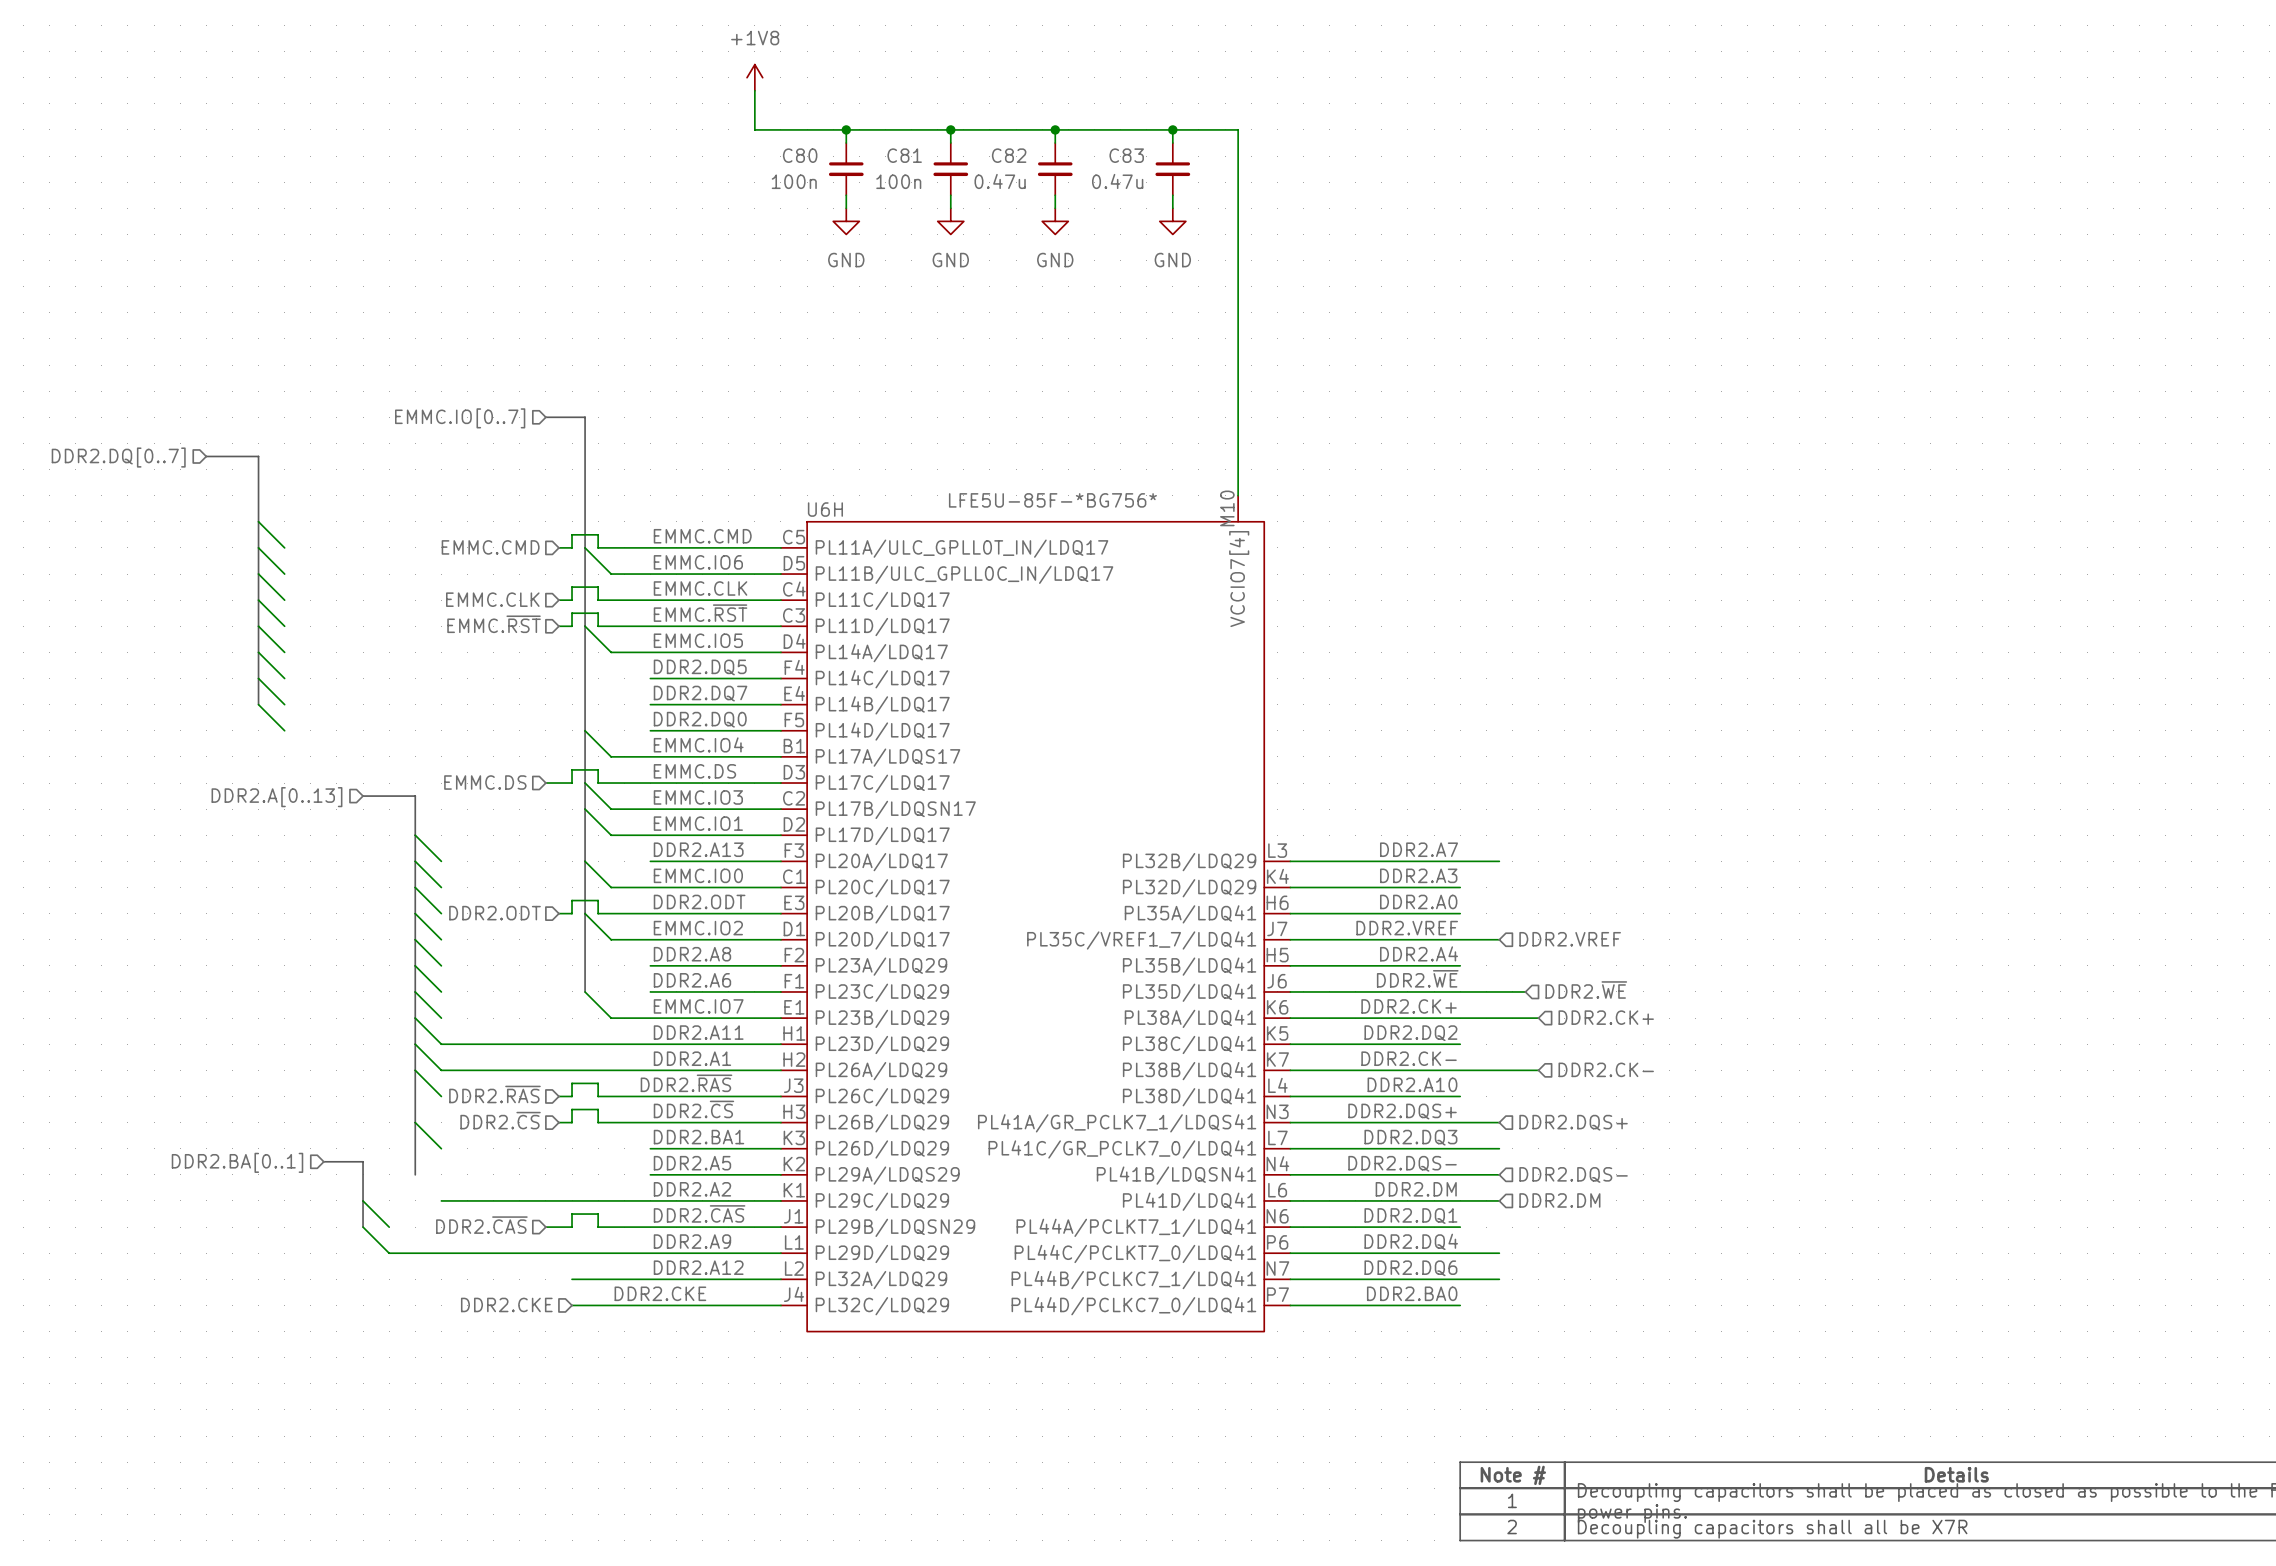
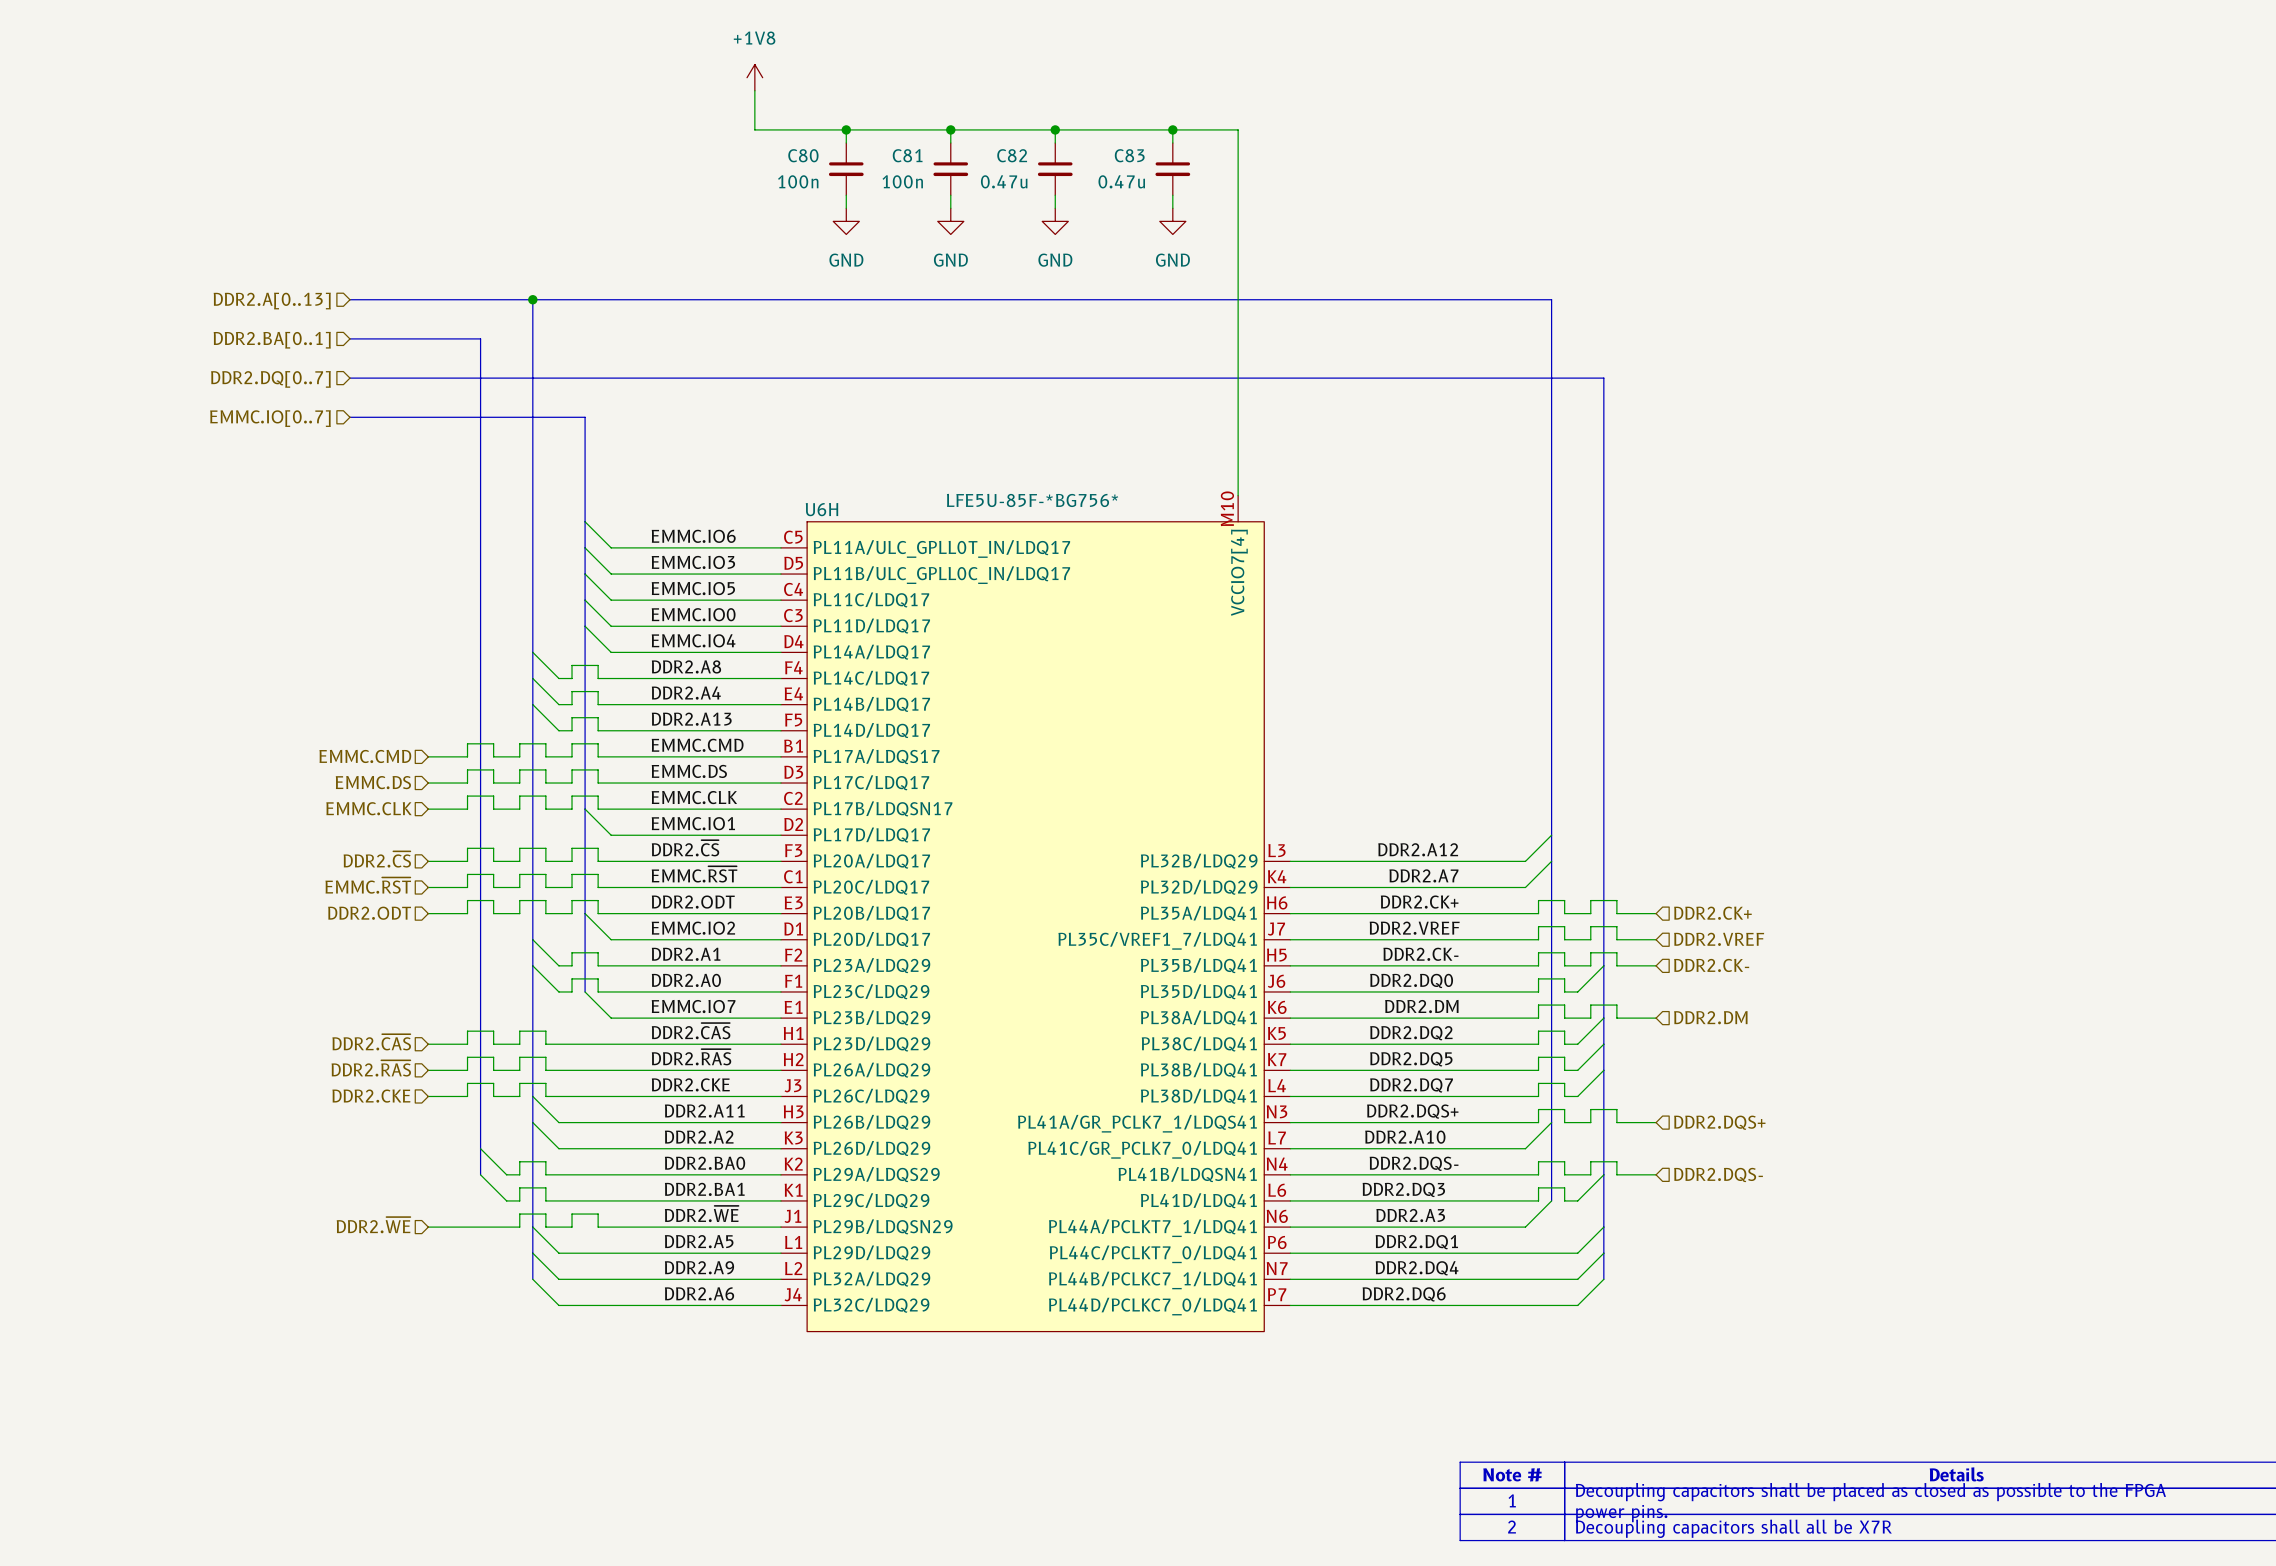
bus: none -> (349, 299) (1551, 299) (1551, 1200)
bus: none -> (532, 299) (532, 1279)
junction: none -> (532, 299)
hierarchical label: none -> DDR2.A[0..13] (272, 301)
bus: none -> (349, 338) (480, 338) (480, 1174)
hierarchical label: none -> DDR2.BA[0..1] (272, 340)
bus: none -> (349, 378) (1603, 378) (1603, 1279)
bus: none -> (349, 417) (545, 417)
hierarchical label position: EMMC.IO[0..7] (460, 418) -> EMMC.IO[0..7] (270, 418)
bus: (206, 456) (258, 456) (258, 704) -> none
hierarchical label position: DDR2.DQ[0..7] (118, 457) -> DDR2.DQ[0..7] (270, 379)
wire: (258, 521) (284, 547) -> none
label: EMMC.CMD (702, 536) -> EMMC.IO6 (693, 536)
wire: (258, 547) (284, 574) -> none
hierarchical label position: EMMC.CMD (490, 547) -> EMMC.CMD (365, 756)
wire: (558, 547) (572, 547) (572, 534) (598, 534) (598, 547) (611, 547) -> (585, 521) (611, 547)
label: EMMC.IO6 (698, 562) -> EMMC.IO3 (693, 562)
wire: (258, 574) (284, 600) -> none
label: EMMC.CLK (700, 588) -> EMMC.IO5 (693, 588)
hierarchical label position: EMMC.CLK (492, 599) -> EMMC.CLK (368, 808)
wire: (258, 600) (284, 626) -> none
wire: (558, 600) (572, 600) (572, 587) (598, 587) (598, 600) (611, 600) -> (585, 574) (611, 600)
label: EMMC.~{RST} (700, 613) -> EMMC.IO0 (693, 614)
hierarchical label: EMMC.~{RST} (494, 624) -> none
wire: (258, 626) (284, 652) -> none
wire: (558, 626) (572, 626) (572, 613) (598, 613) (598, 626) (611, 626) -> (585, 600) (611, 626)
label: EMMC.IO5 (698, 640) -> EMMC.IO4 (693, 640)
wire: (258, 652) (284, 678) -> none
wire: none -> (532, 652) (558, 678) (572, 678) (572, 665) (598, 665) (598, 678) (650, 678)
label: DDR2.DQ5 (700, 667) -> DDR2.A8 (686, 666)
wire: (258, 678) (284, 704) -> none
wire: none -> (532, 678) (558, 704) (572, 704) (572, 691) (598, 691) (598, 704) (650, 704)
label: DDR2.DQ7 (700, 693) -> DDR2.A4 (686, 693)
wire: (258, 704) (284, 730) -> none
wire: none -> (532, 704) (558, 730) (572, 730) (572, 717) (598, 717) (598, 730) (650, 730)
label: DDR2.DQ0 (700, 719) -> DDR2.A13 (691, 719)
wire: (585, 730) (611, 756) -> (428, 756) (467, 756) (467, 743) (493, 743) (493, 756) (519, 756) (519, 743) (545, 743) (545, 756) (572, 756) (572, 743) (598, 743) (598, 756) (611, 756)
label: EMMC.IO4 (698, 744) -> EMMC.CMD (697, 745)
hierarchical label position: EMMC.DS (485, 782) -> EMMC.DS (373, 782)
wire: none -> (428, 783) (467, 783) (467, 769) (493, 769) (493, 783) (519, 783) (519, 769) (545, 769) (545, 783)
wire: (585, 783) (611, 809) -> (428, 809) (467, 809) (467, 796) (493, 796) (493, 809) (519, 809) (519, 796) (545, 796) (545, 809) (572, 809) (572, 796) (598, 796) (598, 809) (611, 809)
bus: (363, 796) (415, 796) (415, 1174) -> none
hierarchical label: DDR2.A[0..13] (276, 797) -> none
label: EMMC.IO3 (698, 797) -> EMMC.CLK (694, 797)
wire: (415, 835) (441, 861) -> none
wire: none -> (1551, 835) (1525, 861) (1499, 861)
label: DDR2.A13 (698, 849) -> DDR2.~{CS} (685, 848)
label: DDR2.A7 (1419, 849) -> DDR2.A12 (1418, 849)
hierarchical label: none -> DDR2.~{CS} (377, 859)
wire: (415, 861) (441, 887) -> none
wire: none -> (428, 861) (467, 861) (467, 848) (493, 848) (493, 861) (519, 861) (519, 848) (545, 848) (545, 861) (572, 861) (572, 848) (598, 848) (598, 861) (650, 861)
wire: (585, 861) (611, 887) -> (428, 887) (467, 887) (467, 874) (493, 874) (493, 887) (519, 887) (519, 874) (545, 874) (545, 887) (572, 887) (572, 874) (598, 874) (598, 887) (611, 887)
wire: none -> (1551, 861) (1525, 887) (1460, 887)
label: EMMC.IO0 (698, 875) -> EMMC.~{RST} (694, 874)
label: DDR2.A3 (1418, 875) -> DDR2.A7 (1423, 875)
hierarchical label: none -> EMMC.~{RST} (368, 885)
wire: (415, 887) (441, 913) -> none
label: DDR2.A0 (1418, 901) -> DDR2.CK+ (1419, 902)
wire: (415, 913) (441, 939) -> none
wire: none -> (428, 913) (467, 913) (467, 900) (493, 900) (493, 913) (519, 913) (519, 900) (545, 900) (545, 913) (558, 913)
hierarchical label position: DDR2.ODT (494, 913) -> DDR2.ODT (369, 913)
wire: none -> (1460, 913) (1538, 913) (1538, 900) (1564, 900) (1564, 913) (1590, 913) (1590, 900) (1616, 900) (1616, 913) (1656, 913)
wire: (415, 939) (441, 965) -> none
wire: none -> (532, 939) (558, 965) (572, 965) (572, 952) (598, 952) (598, 965) (650, 965)
wire: none -> (1499, 939) (1538, 939) (1538, 926) (1564, 926) (1564, 939) (1590, 939) (1590, 926) (1616, 926) (1616, 939) (1656, 939)
hierarchical label position: DDR2.VREF (1570, 939) -> DDR2.VREF (1719, 939)
label: DDR2.A4 (1419, 953) -> DDR2.CK- (1420, 954)
label: DDR2.A8 (692, 954) -> DDR2.A1 (686, 954)
wire: (415, 965) (441, 991) -> none
wire: none -> (532, 965) (558, 991) (572, 991) (572, 978) (598, 978) (598, 991) (650, 991)
wire: none -> (1460, 965) (1538, 965) (1538, 952) (1564, 952) (1564, 965) (1590, 965) (1590, 952) (1616, 952) (1616, 965) (1656, 965)
wire: none -> (1603, 965) (1577, 991) (1564, 991) (1564, 978) (1538, 978) (1538, 991) (1525, 991)
label: DDR2.~{WE} (1417, 978) -> none
label: DDR2.A6 (692, 980) -> DDR2.A0 (686, 980)
label: none -> DDR2.DQ0 (1411, 980)
hierarchical label: DDR2.~{WE} (1586, 989) -> none
wire: (415, 991) (441, 1018) -> none
label: DDR2.CK+ (1409, 1006) -> DDR2.DM (1421, 1006)
hierarchical label position: DDR2.CK+ (1606, 1017) -> DDR2.CK+ (1712, 913)
wire: (415, 1018) (441, 1044) -> (428, 1044) (441, 1044)
wire: none -> (1538, 1018) (1538, 1005) (1564, 1005) (1564, 1018) (1590, 1018) (1590, 1005) (1616, 1005) (1616, 1018) (1656, 1018)
wire: none -> (1603, 1018) (1577, 1044) (1564, 1044) (1564, 1031) (1538, 1031) (1538, 1044) (1460, 1044)
label: DDR2.A11 (698, 1032) -> DDR2.~{CAS} (691, 1031)
label position: DDR2.DQ2 (1410, 1033) -> DDR2.DQ2 (1411, 1033)
wire: (415, 1044) (441, 1070) -> (428, 1070) (441, 1070)
wire: (467, 1044) (493, 1044) -> (467, 1044) (467, 1031) (493, 1031) (493, 1044)
wire: (519, 1044) (545, 1044) -> (519, 1044) (519, 1031) (545, 1031) (545, 1044)
wire: none -> (1603, 1044) (1577, 1070) (1564, 1070) (1564, 1057) (1538, 1057) (1538, 1070)
label: DDR2.A1 (692, 1058) -> DDR2.~{RAS} (691, 1057)
label: DDR2.CK- (1409, 1058) -> none
label: none -> DDR2.DQ5 (1411, 1059)
hierarchical label position: DDR2.CK- (1606, 1069) -> DDR2.CK- (1711, 965)
wire: (415, 1070) (441, 1096) -> none
wire: (467, 1070) (493, 1070) -> (467, 1070) (467, 1057) (493, 1057) (493, 1070)
wire: (519, 1070) (545, 1070) -> (519, 1070) (519, 1057) (545, 1057) (545, 1070)
wire: none -> (1603, 1070) (1577, 1096) (1564, 1096) (1564, 1083) (1538, 1083) (1538, 1096) (1460, 1096)
label: DDR2.~{RAS} (686, 1083) -> DDR2.A11 (704, 1111)
label position: DDR2.A10 (1412, 1084) -> DDR2.A10 (1405, 1137)
label: none -> DDR2.DQ7 (1411, 1085)
hierarchical label position: DDR2.~{RAS} (494, 1094) -> DDR2.~{RAS} (371, 1068)
wire: none -> (428, 1096) (467, 1096) (467, 1083) (493, 1083) (493, 1096) (519, 1096) (519, 1083) (545, 1083) (545, 1096) (558, 1096)
wire: (572, 1096) (572, 1083) (598, 1083) (598, 1096) -> (572, 1096) (598, 1096)
label: DDR2.~{CS} (693, 1109) -> none
hierarchical label: DDR2.~{CS} (500, 1120) -> none
wire: (415, 1122) (441, 1148) -> (532, 1096) (558, 1122)
wire: none -> (532, 1122) (558, 1148) (650, 1148)
wire: (572, 1122) (572, 1109) (598, 1109) (598, 1122) -> (572, 1122) (598, 1122)
wire: none -> (1499, 1122) (1538, 1122) (1538, 1109) (1564, 1109) (1564, 1122) (1590, 1122) (1590, 1109) (1616, 1109) (1616, 1122) (1656, 1122)
wire: none -> (1551, 1122) (1525, 1148) (1499, 1148)
hierarchical label position: DDR2.DQS+ (1573, 1122) -> DDR2.DQS+ (1719, 1122)
label position: DDR2.BA1 (698, 1137) -> DDR2.BA1 (704, 1189)
label position: DDR2.DQ3 (1410, 1137) -> DDR2.DQ3 (1403, 1189)
wire: none -> (480, 1148) (506, 1174) (519, 1174) (519, 1161) (545, 1161) (545, 1174) (650, 1174)
bus: (323, 1161) (363, 1161) (363, 1227) -> none
hierarchical label: DDR2.BA[0..1] (237, 1162) -> none
label position: DDR2.A5 (692, 1163) -> DDR2.A5 (699, 1241)
label: none -> DDR2.BA0 (705, 1163)
wire: none -> (1499, 1174) (1538, 1174) (1538, 1161) (1564, 1161) (1564, 1174) (1590, 1174) (1590, 1161) (1616, 1161) (1616, 1174) (1656, 1174)
hierarchical label position: DDR2.DQS- (1573, 1174) -> DDR2.DQS- (1718, 1174)
wire: none -> (1603, 1174) (1577, 1200) (1564, 1200) (1564, 1187) (1538, 1187) (1538, 1200) (1499, 1200)
label position: DDR2.A2 (692, 1189) -> DDR2.A2 (699, 1137)
label: DDR2.DM (1416, 1189) -> none
wire: (363, 1200) (389, 1227) -> none
wire: (441, 1200) (506, 1200) -> (480, 1174) (506, 1200)
wire: (519, 1200) (545, 1200) -> (519, 1200) (519, 1187) (545, 1187) (545, 1200)
wire: none -> (1551, 1200) (1525, 1227) (1460, 1227)
hierarchical label position: DDR2.DM (1559, 1200) -> DDR2.DM (1710, 1017)
label: DDR2.~{CAS} (699, 1213) -> DDR2.~{WE} (701, 1214)
label: DDR2.DQ1 (1410, 1216) -> DDR2.A3 (1410, 1215)
hierarchical label: none -> DDR2.~{WE} (373, 1225)
hierarchical label position: DDR2.~{CAS} (481, 1225) -> DDR2.~{CAS} (371, 1042)
wire: (363, 1227) (389, 1253) (558, 1253) -> (532, 1227) (558, 1253)
wire: none -> (428, 1227) (519, 1227) (519, 1214) (545, 1214) (545, 1227)
wire: none -> (1603, 1227) (1577, 1253) (1499, 1253)
label position: DDR2.A9 (692, 1241) -> DDR2.A9 (699, 1267)
label: DDR2.DQ4 (1411, 1241) -> DDR2.DQ1 (1416, 1242)
wire: none -> (532, 1253) (558, 1279) (572, 1279)
wire: none -> (1603, 1253) (1577, 1279) (1499, 1279)
label: DDR2.A12 (698, 1267) -> DDR2.A6 (699, 1293)
label: DDR2.DQ6 (1410, 1268) -> DDR2.DQ4 (1417, 1268)
wire: none -> (532, 1279) (558, 1305) (572, 1305)
wire: none -> (1603, 1279) (1577, 1305) (1460, 1305)
label position: DDR2.CKE (660, 1293) -> DDR2.CKE (690, 1084)
label: DDR2.BA0 (1412, 1293) -> DDR2.DQ6 (1404, 1294)
hierarchical label position: DDR2.CKE (506, 1304) -> DDR2.CKE (371, 1096)

